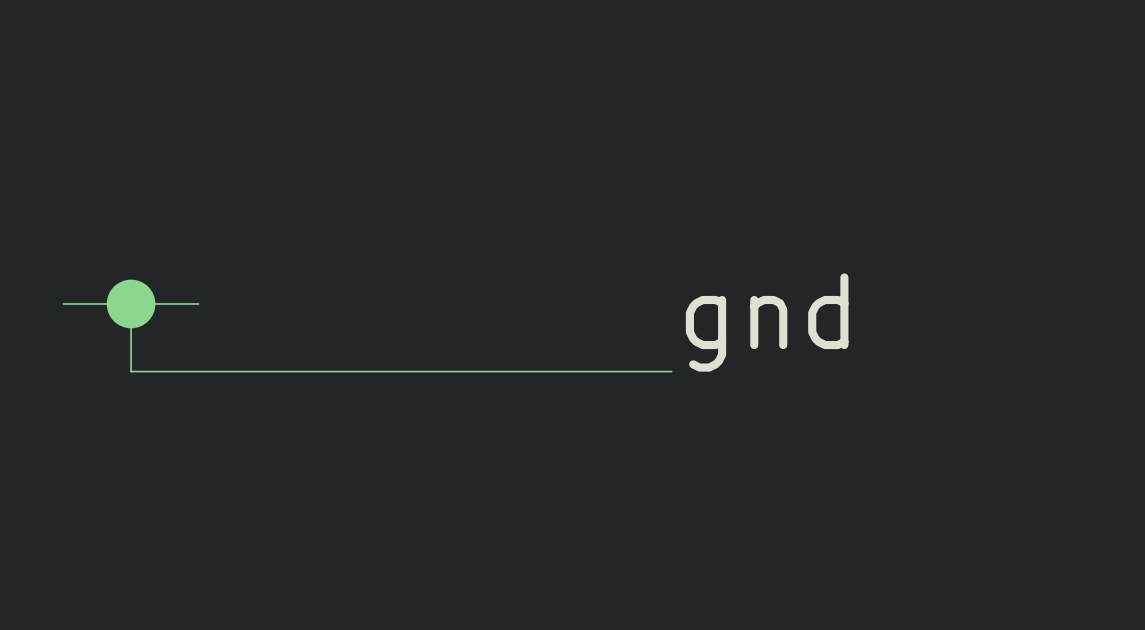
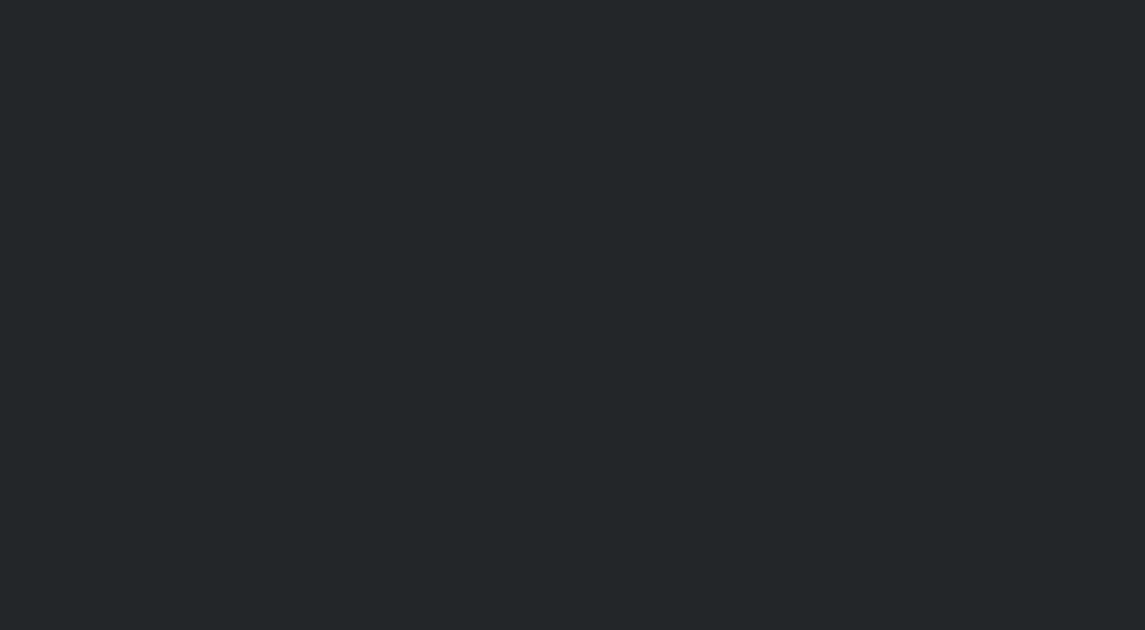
wire: (63, 303) (198, 303) -> none
wire: (131, 303) (131, 371) (671, 371) -> none
junction: (131, 303) -> none
label: gnd (767, 322) -> none

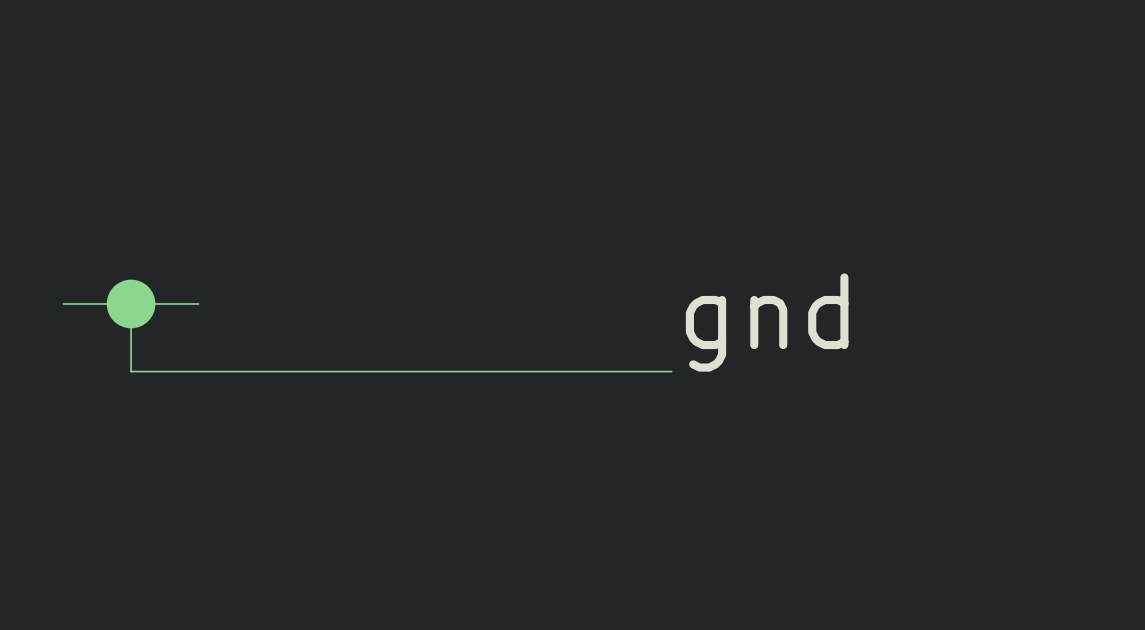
wire: none -> (63, 303) (198, 303)
wire: none -> (131, 303) (131, 371) (671, 371)
junction: none -> (131, 303)
label: none -> gnd (767, 322)

